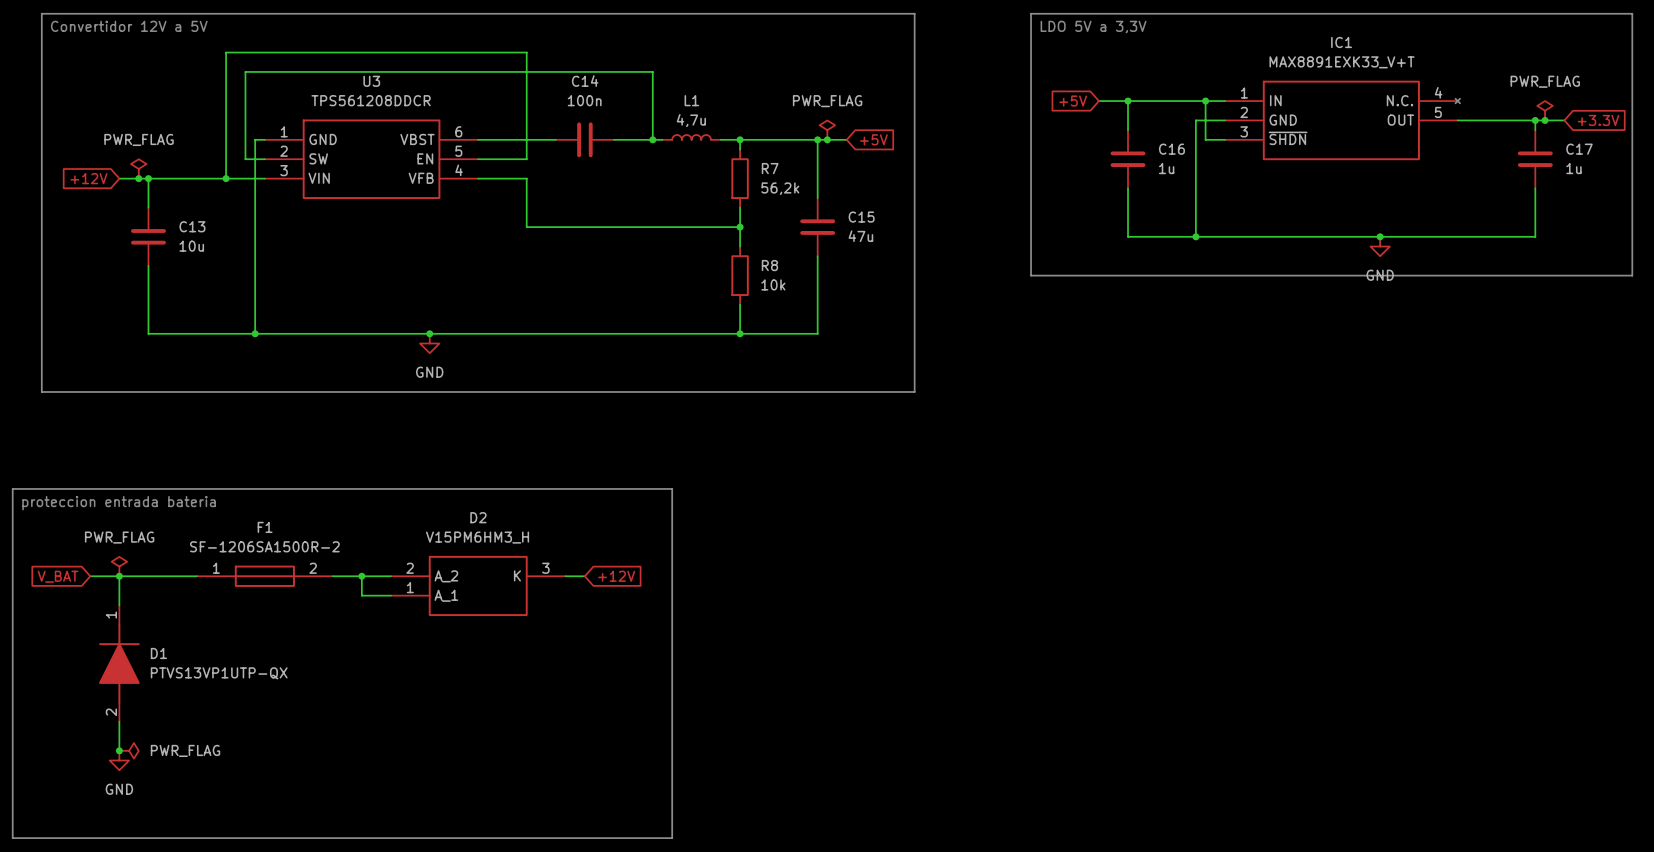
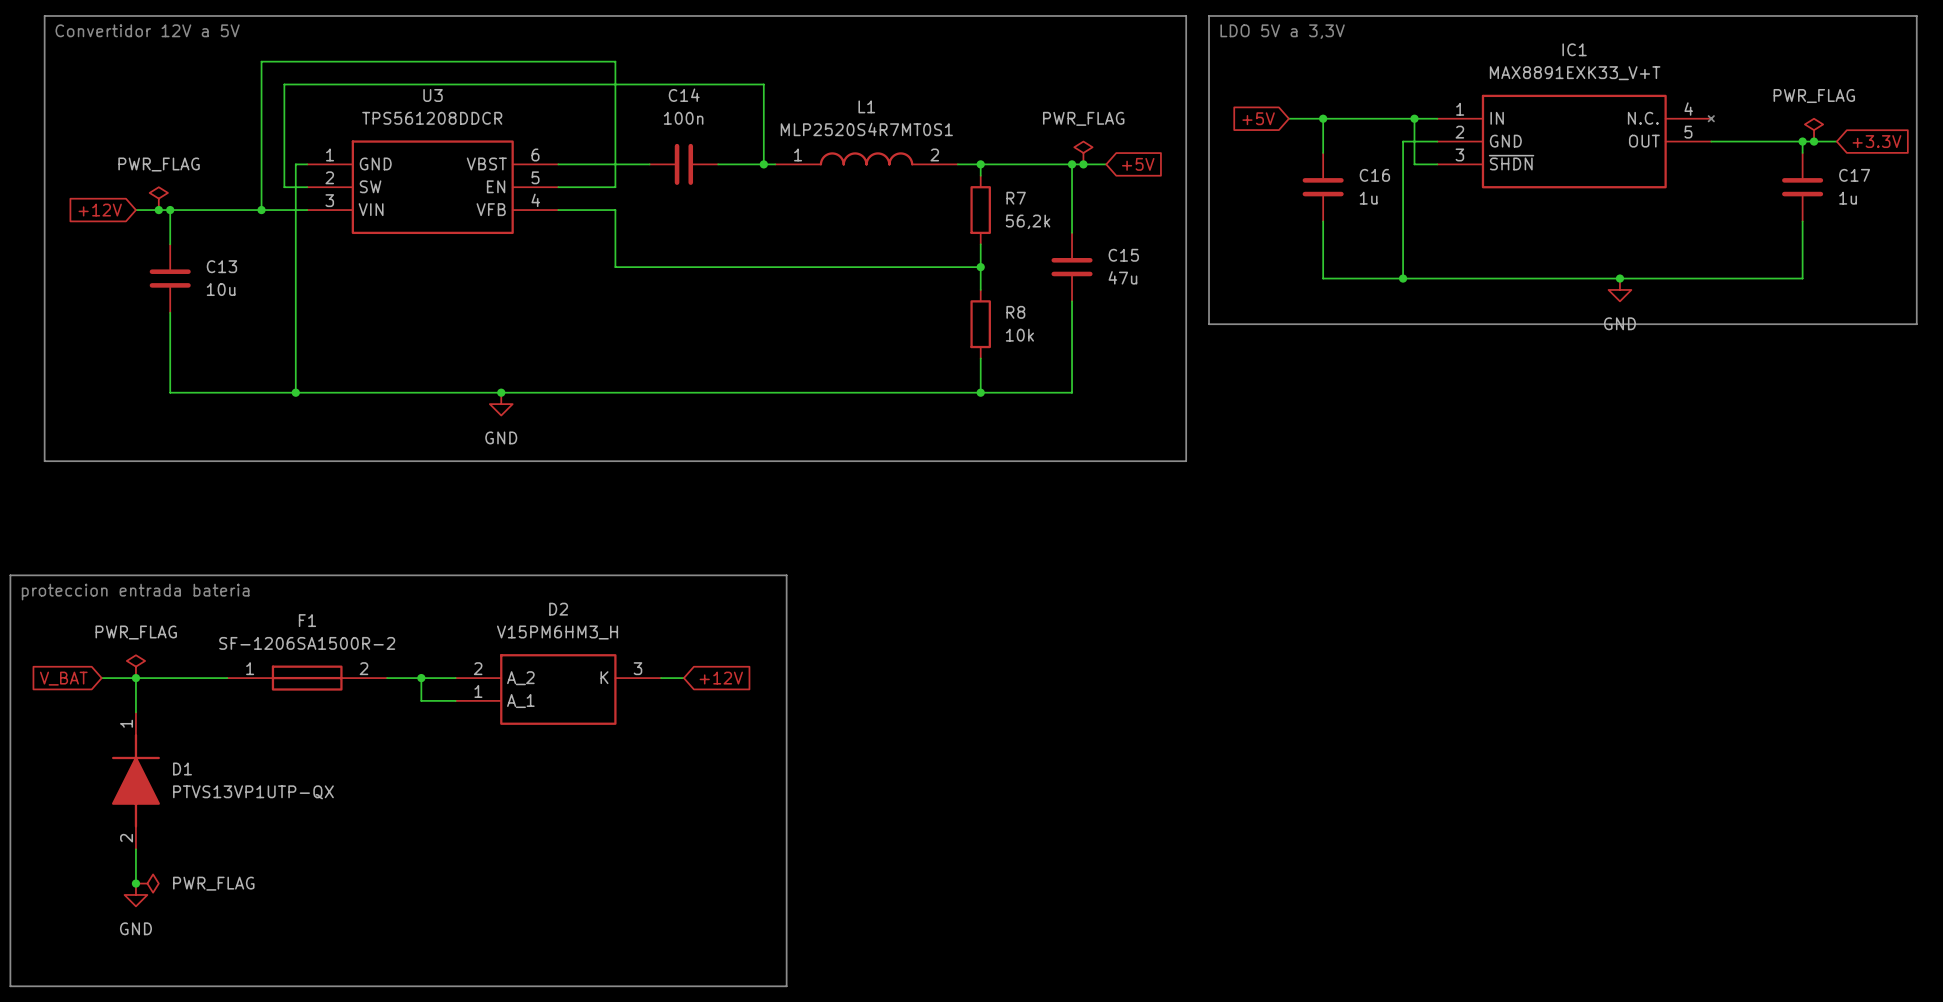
line: (914, 13) (914, 391) -> (1072, 15) (1186, 15) (1186, 461) (1072, 461)
L1 value: 4,7u (691, 120) -> MLP2520S4R7MT0S1 (866, 129)
power symbol position: PWR_FLAG (827, 130) -> PWR_FLAG (1083, 152)
L1 symbol: [662, 135, 721, 140] -> [775, 152, 958, 166]
wire: (720, 139) (817, 139) (817, 198) -> none
wire: (740, 139) (740, 149) -> (980, 164) (980, 175)
junction: (740, 139) -> none
junction: (817, 139) -> none
junction: (827, 139) -> none
junction: none -> (980, 164)
wire: none -> (992, 164) (1106, 164)
global label position: +5V (873, 139) -> +5V (1138, 164)
junction: none -> (1072, 164)
junction: none -> (1083, 164)
R7 position: (740, 178) -> (980, 210)
wire: (740, 207) (740, 246) -> (980, 244) (980, 289)
wire: none -> (866, 267) (980, 267)
junction: (740, 227) -> none
C15 position: (817, 227) -> (1072, 267)
junction: none -> (980, 267)
wire: (817, 256) (817, 333) -> (1072, 301) (1072, 392) (957, 392)
R8 position: (740, 275) -> (980, 324)
wire: (740, 304) (740, 333) -> (980, 358) (980, 392)
junction: (740, 333) -> none
junction: none -> (980, 392)

